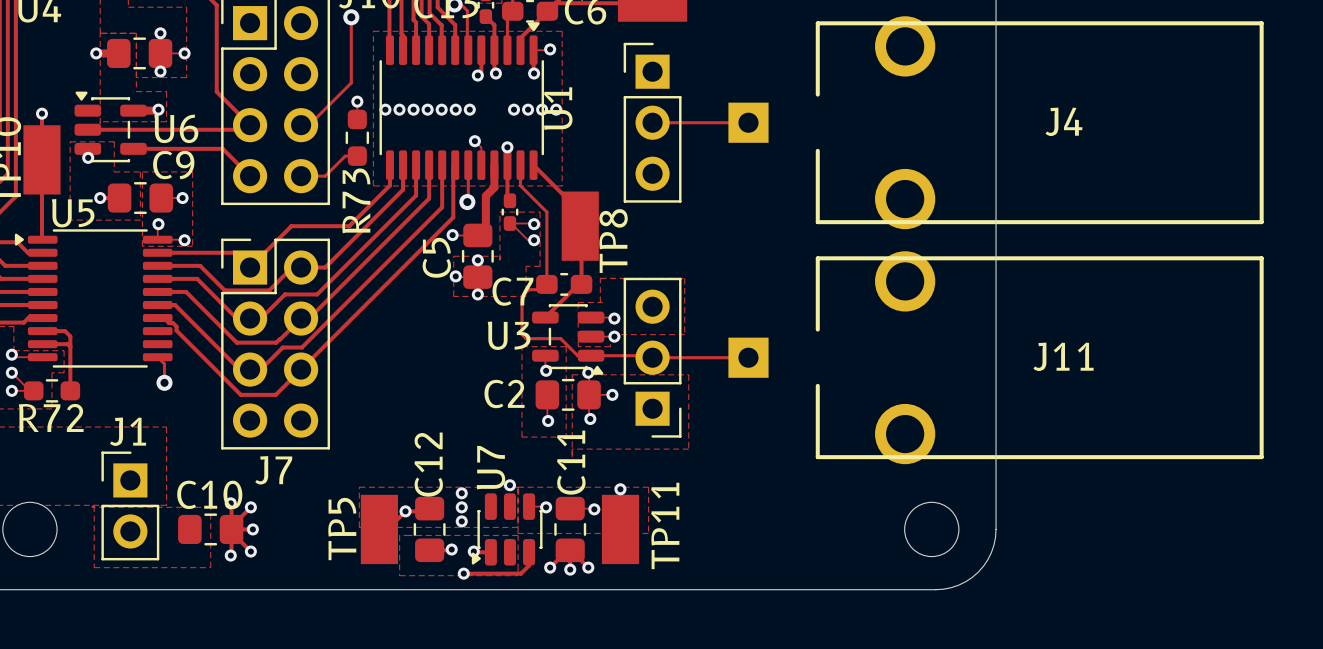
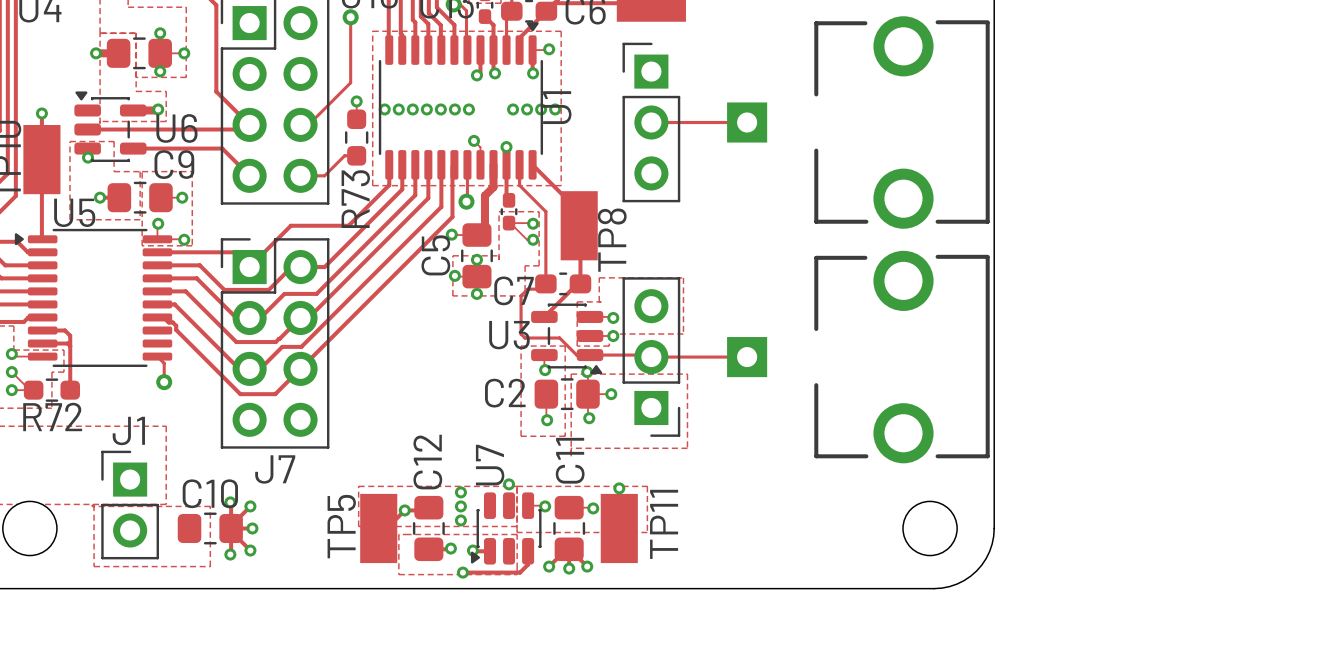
part: none -> (858, 122)
J4: (996, 122) -> none
part: none -> (858, 357)
J11: (996, 357) -> none

